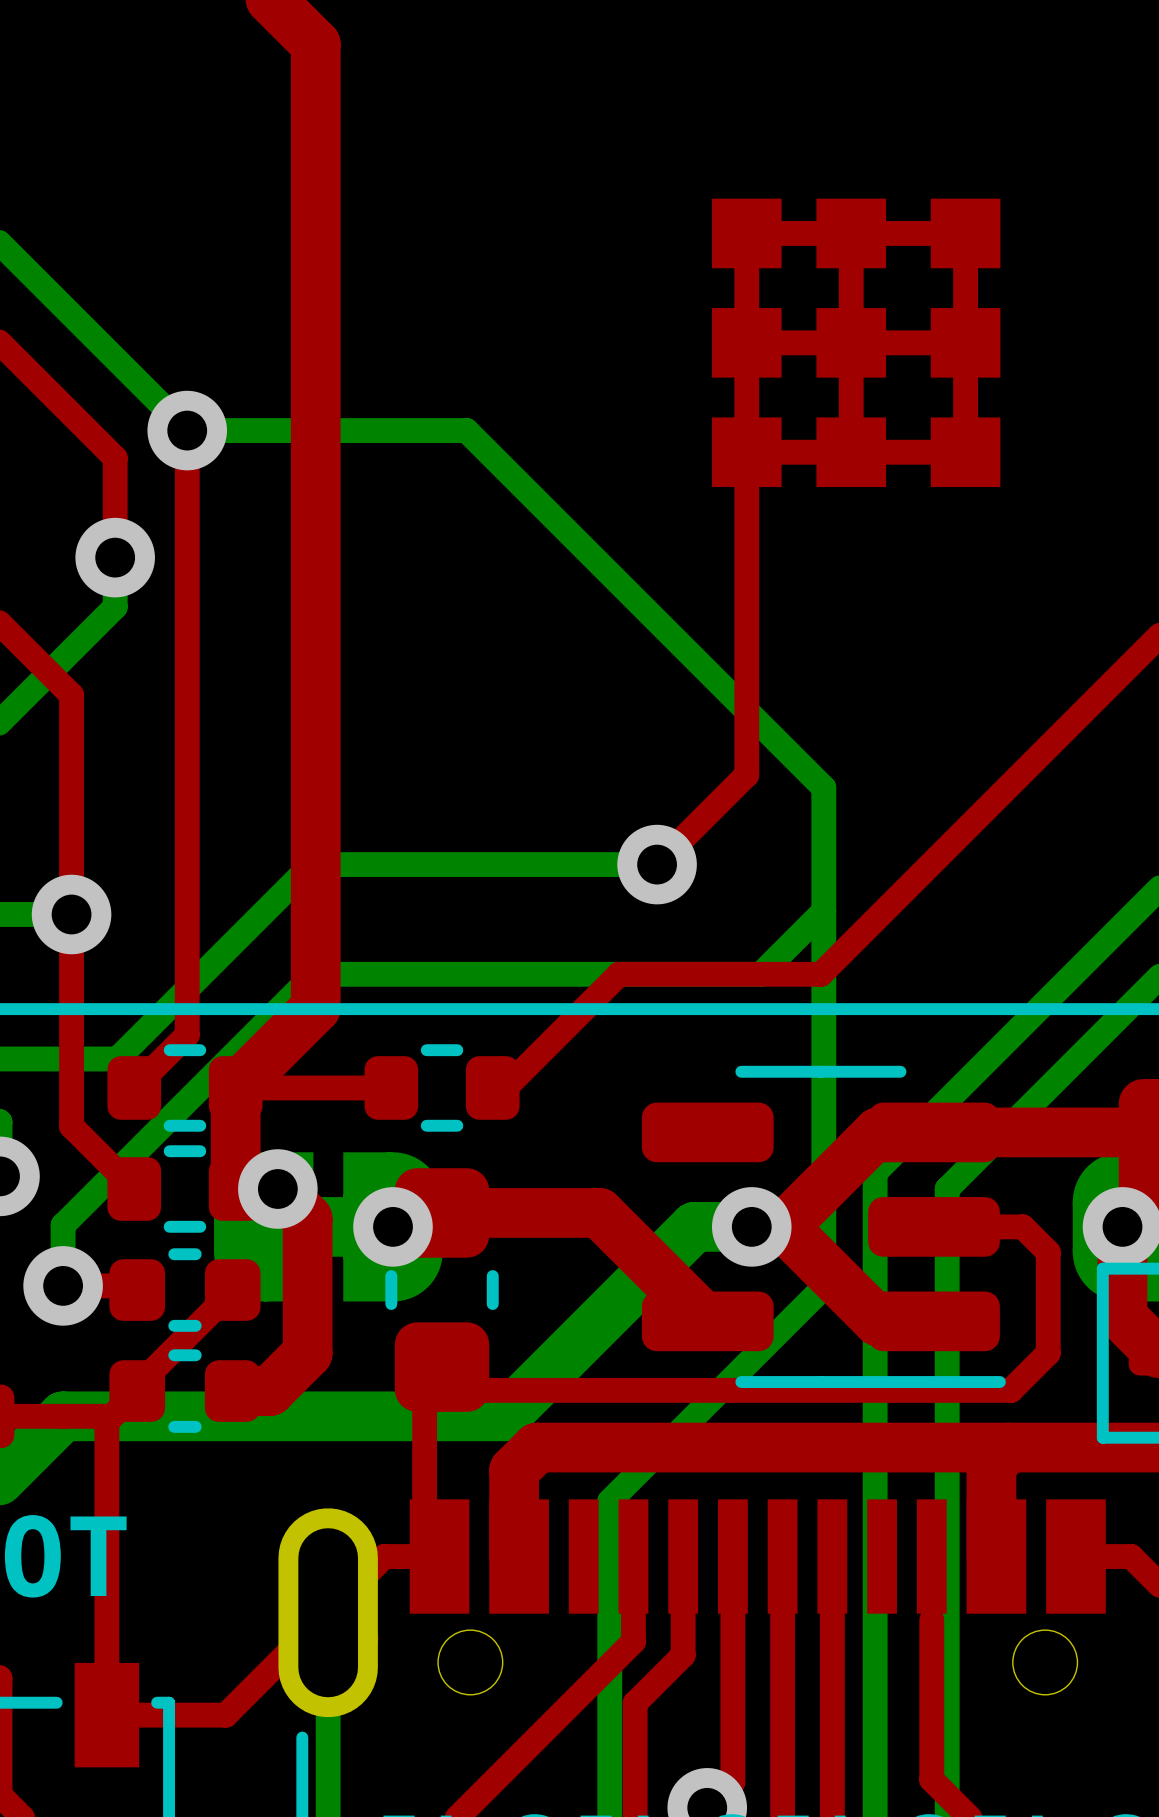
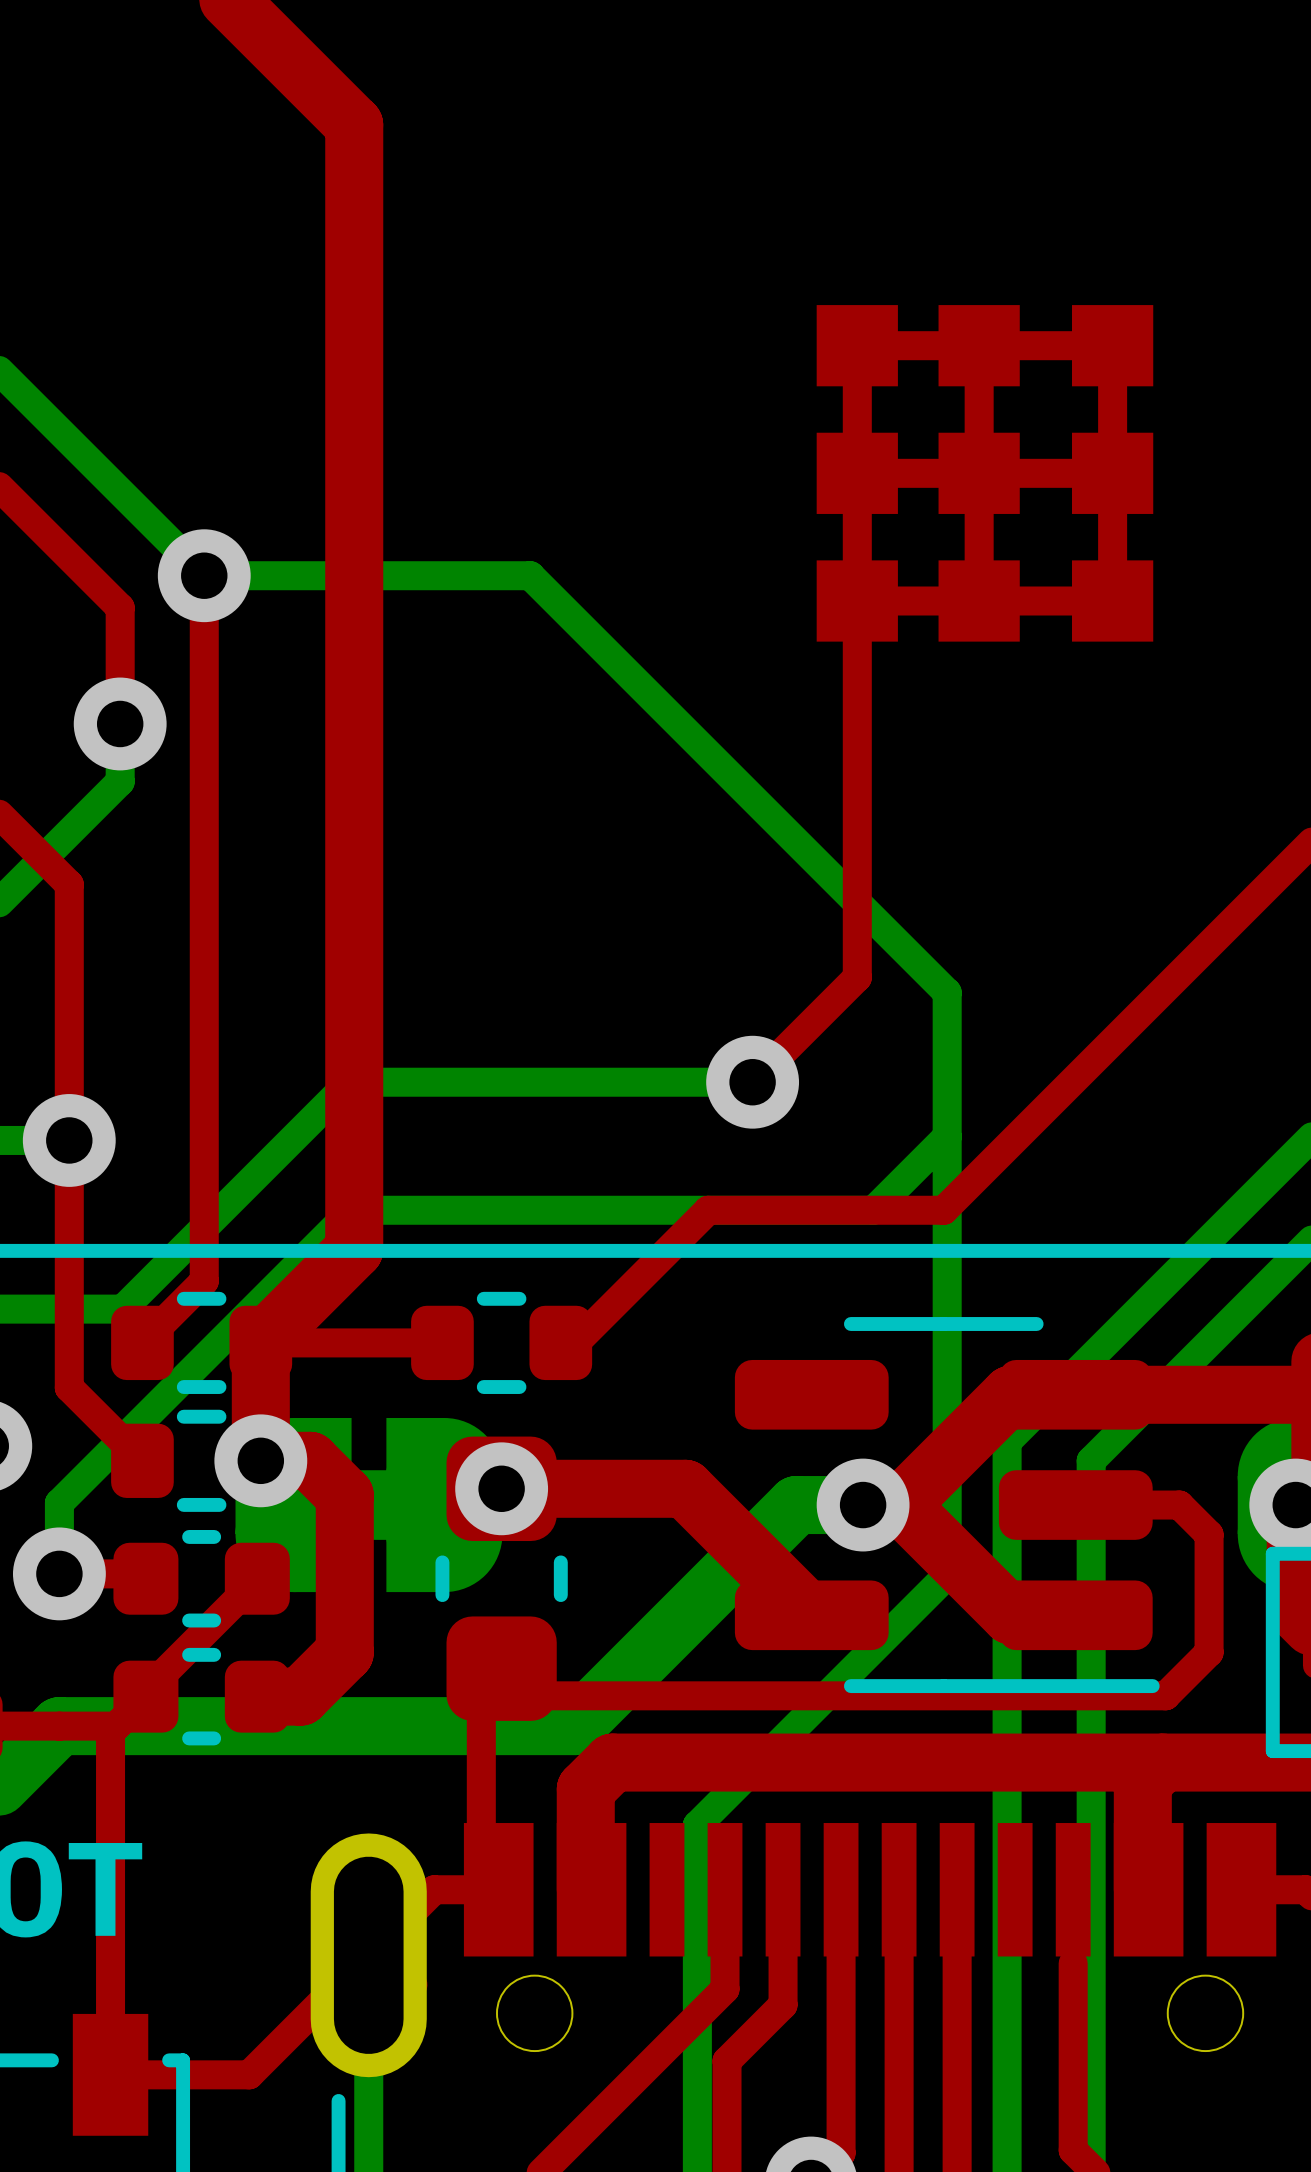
via position: (277, 1189) -> (260, 1460)
via position: (393, 1226) -> (501, 1488)

